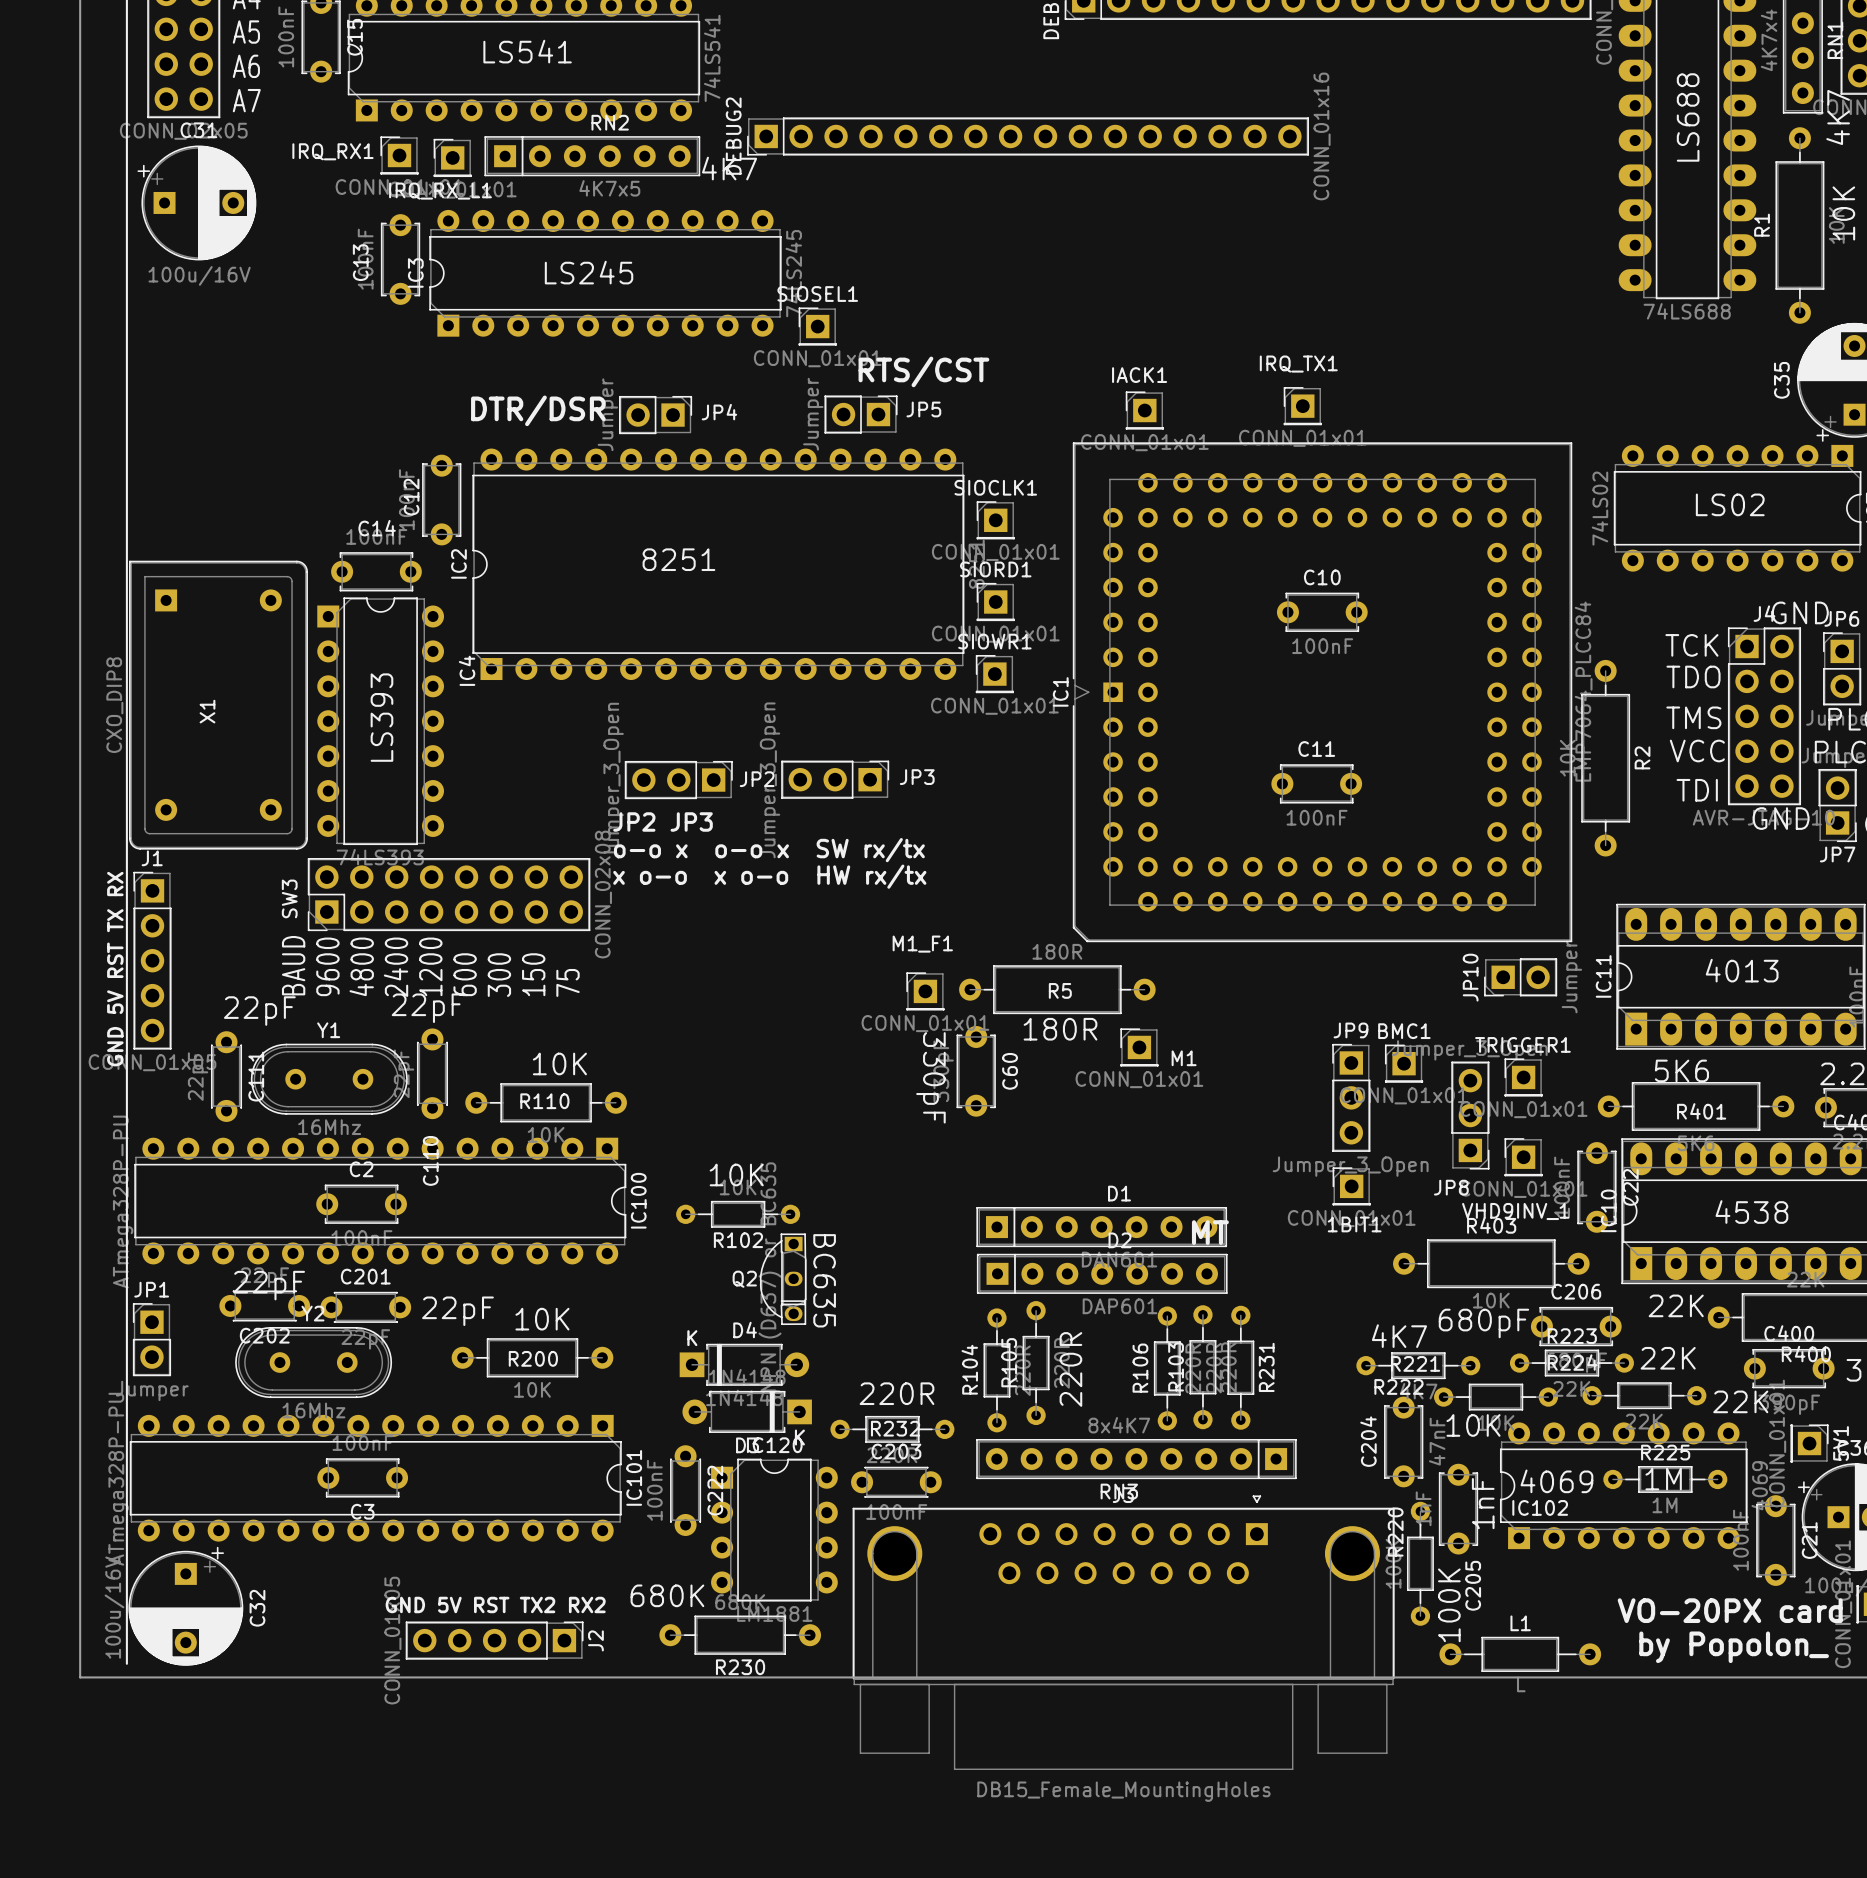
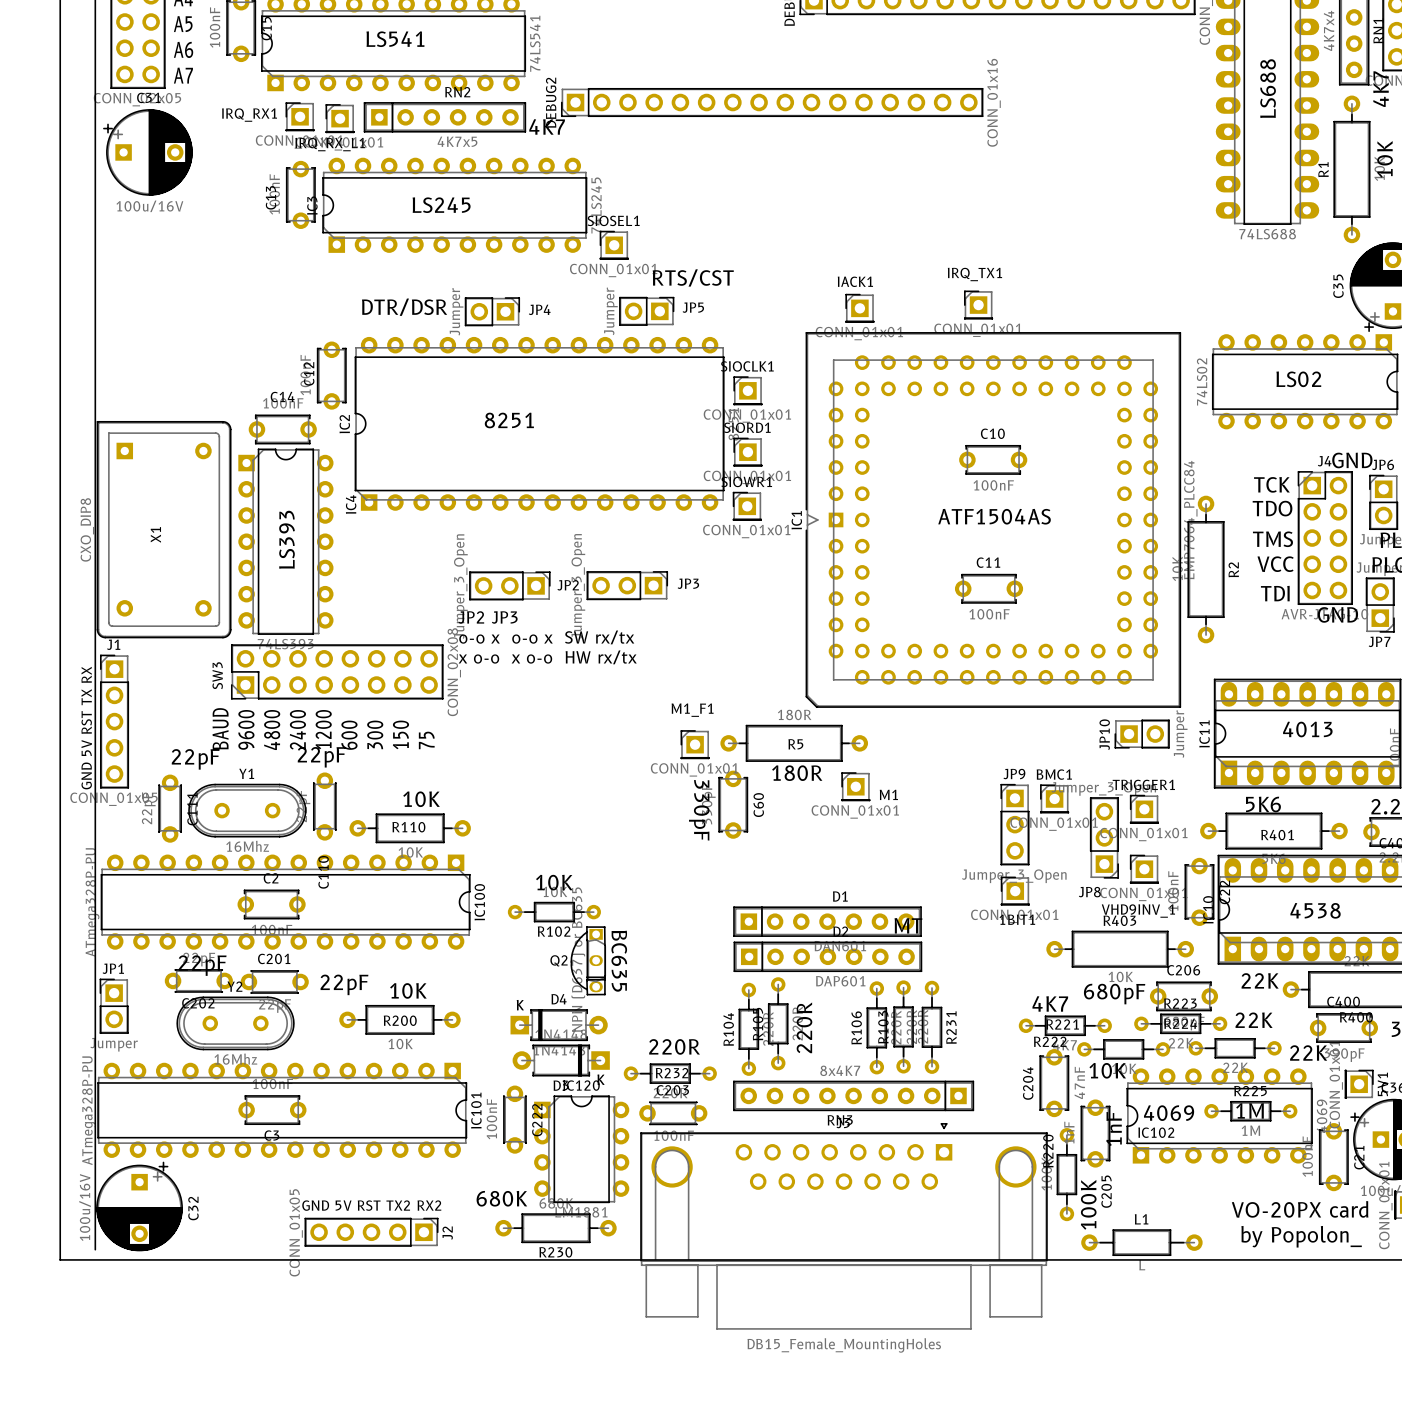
text: none -> ATF1504AS (994, 516)

